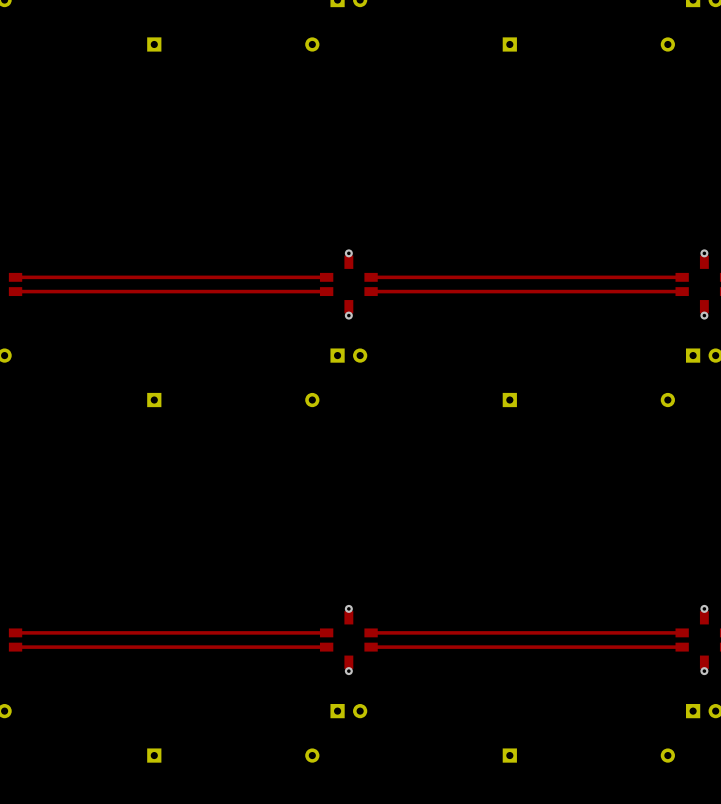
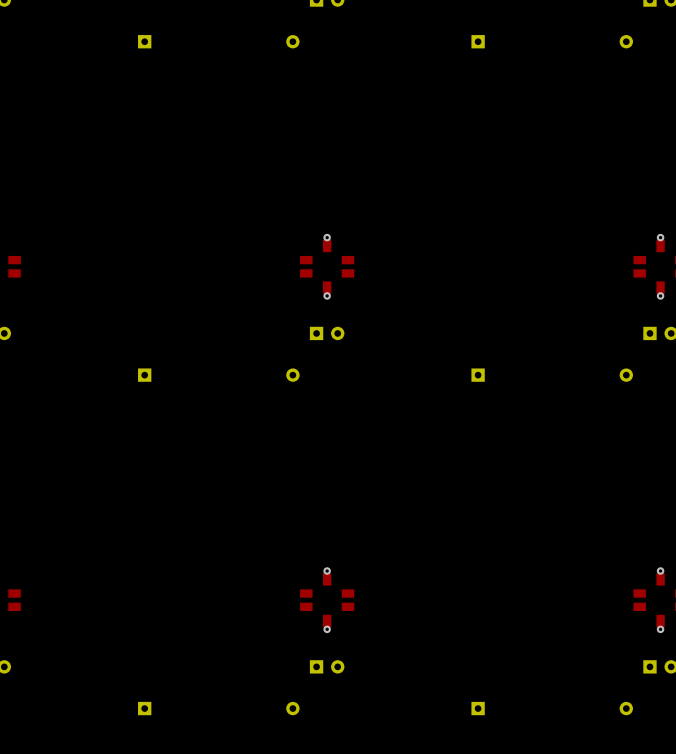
top track: (15, 277) (326, 277) -> none
top track: (371, 277) (682, 277) -> none
top track: (15, 291) (326, 291) -> none
top track: (371, 291) (682, 291) -> none
top track: (15, 632) (326, 632) -> none
top track: (371, 632) (682, 632) -> none
top track: (15, 647) (326, 647) -> none
top track: (371, 647) (682, 647) -> none

